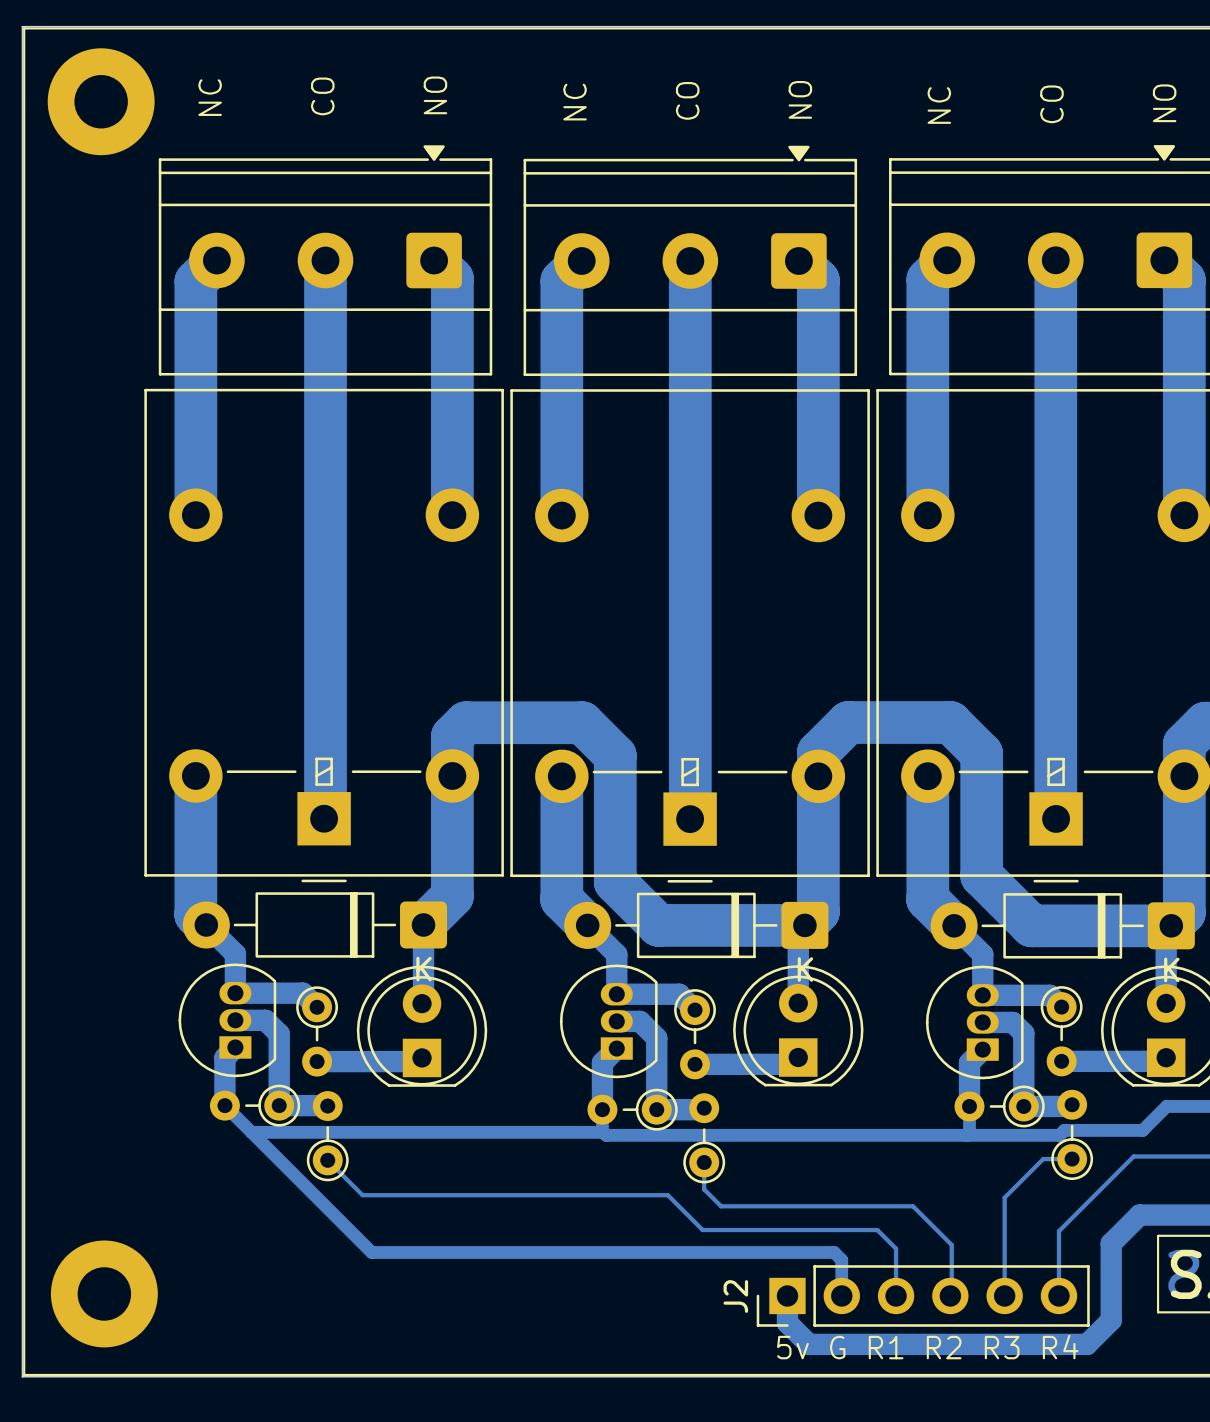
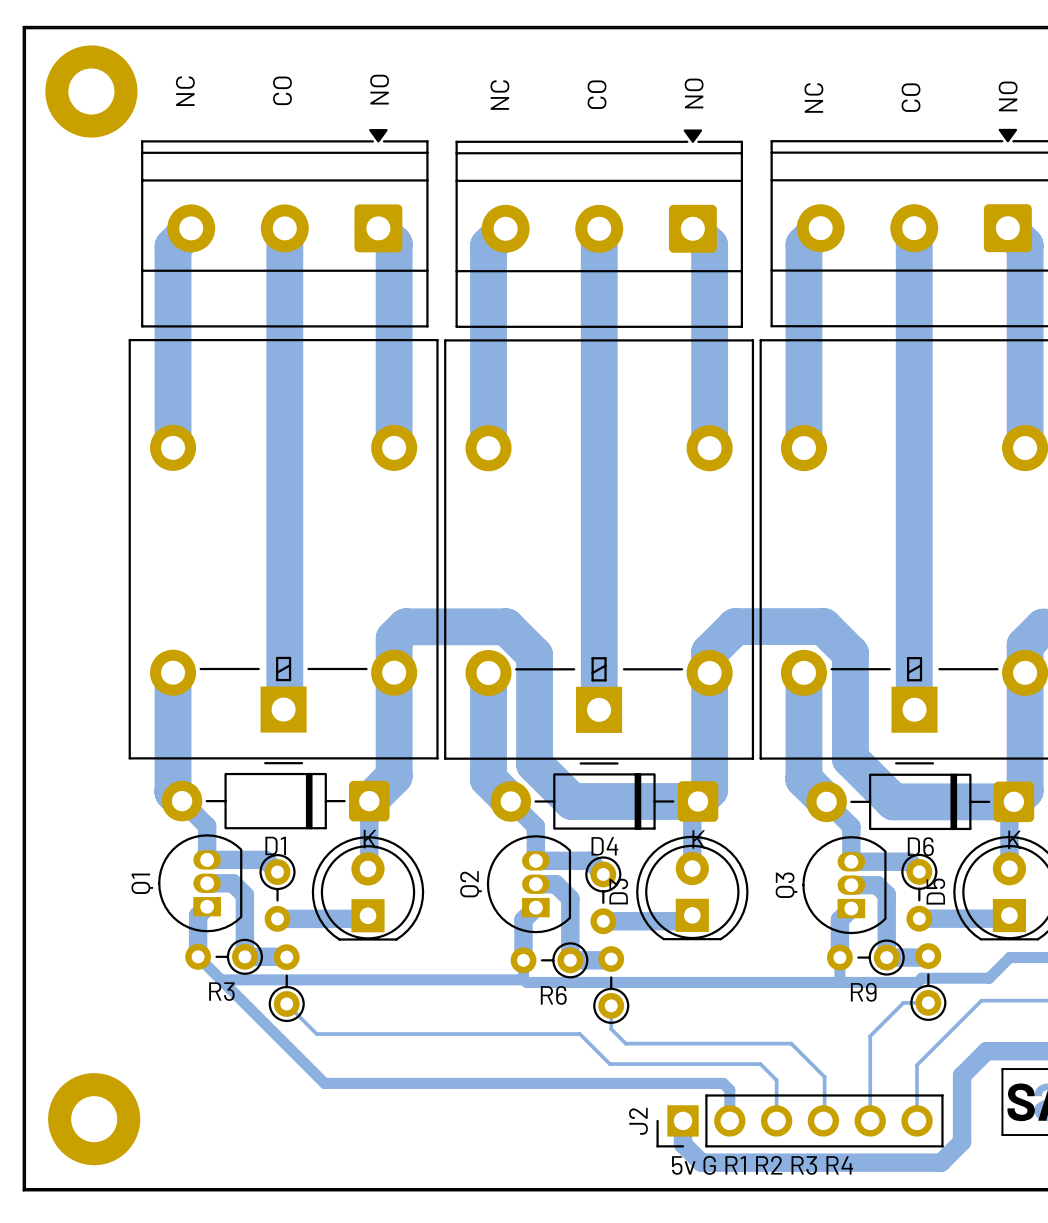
D1 name: none -> D1 (275, 845)
D4 name: none -> D4 (604, 846)
D6 name: none -> D6 (920, 846)
Q1 name: none -> Q1 (142, 883)
Q2 name: none -> Q2 (470, 884)
Q3 name: none -> Q3 (786, 885)
D3 name: none -> D3 (618, 891)
D5 name: none -> D5 (935, 891)
R3 name: none -> R3 (221, 991)
R9 name: none -> R9 (863, 992)
R6 name: none -> R6 (553, 995)

